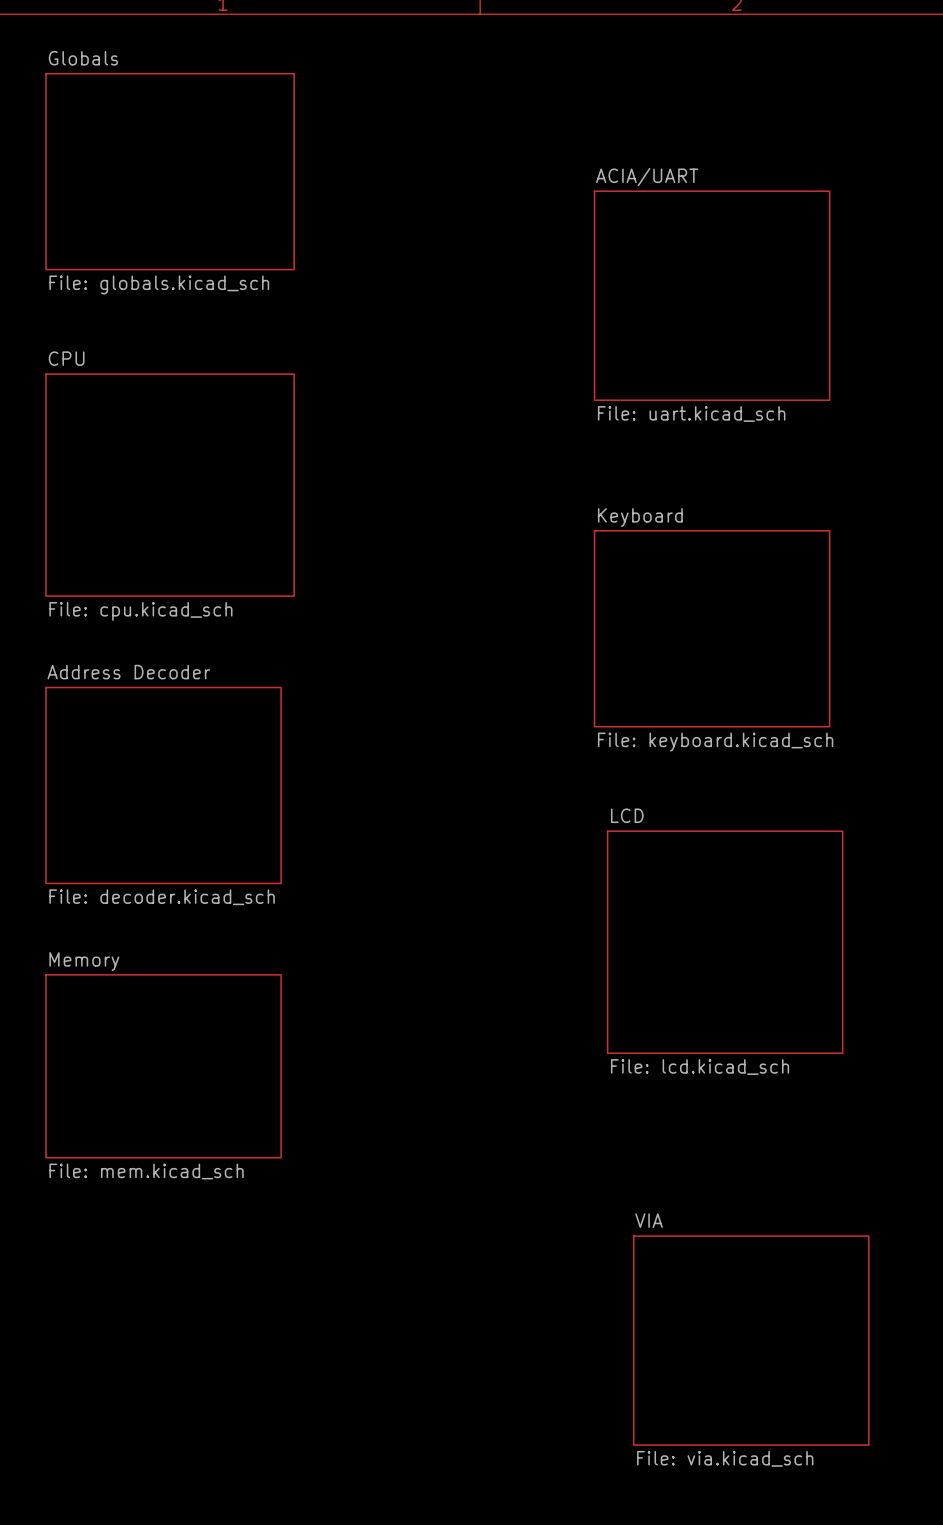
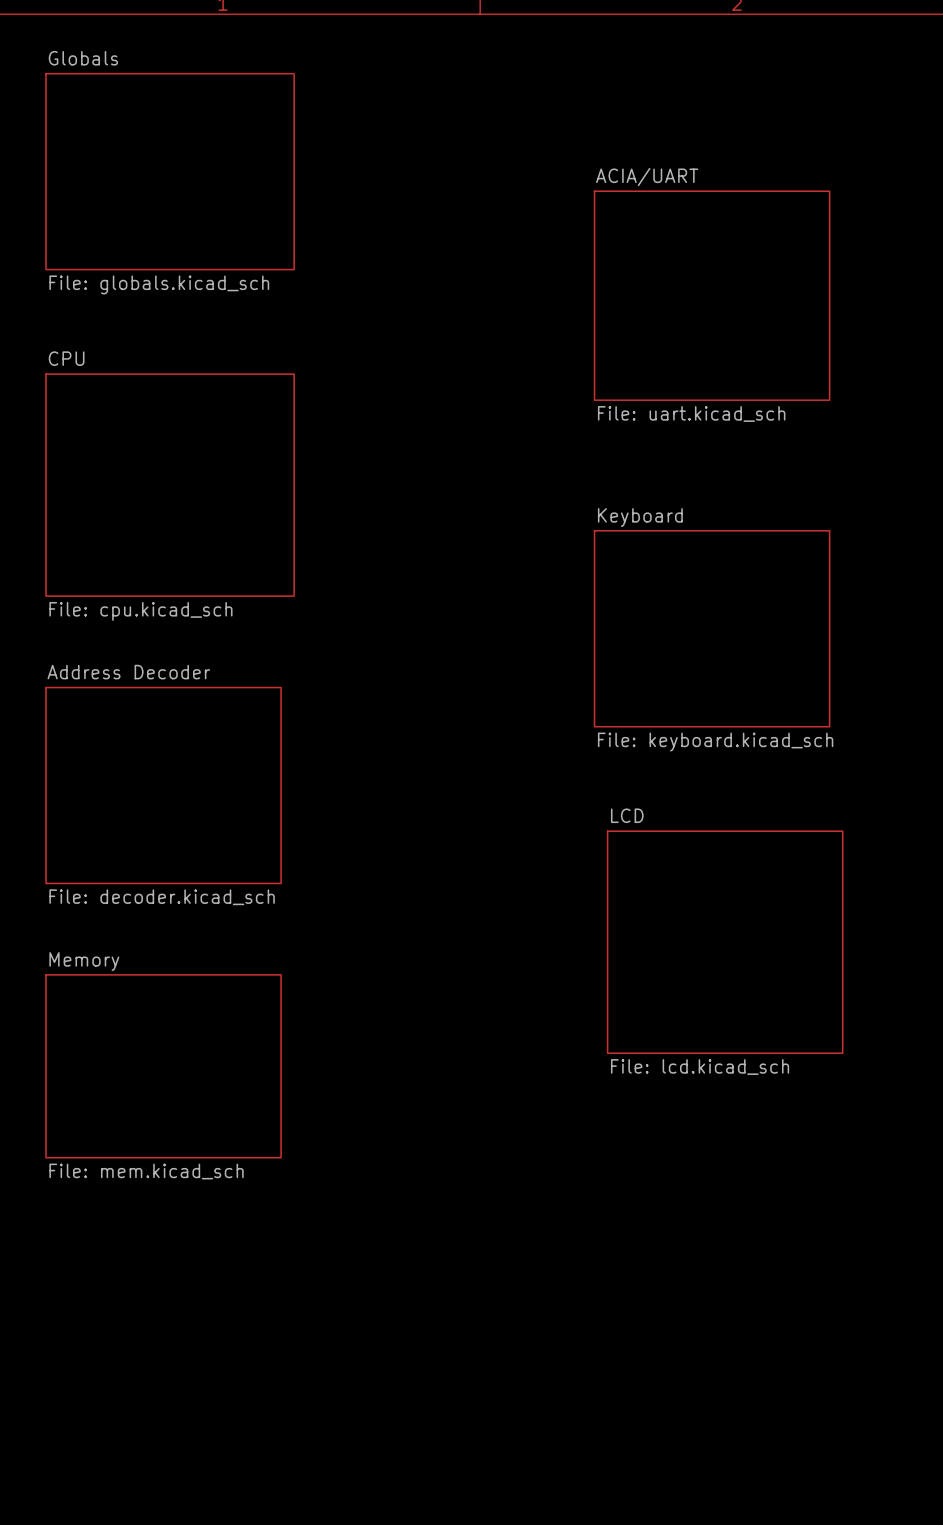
sheet VIA: File: via.kicad_sch (751, 1340) -> none

